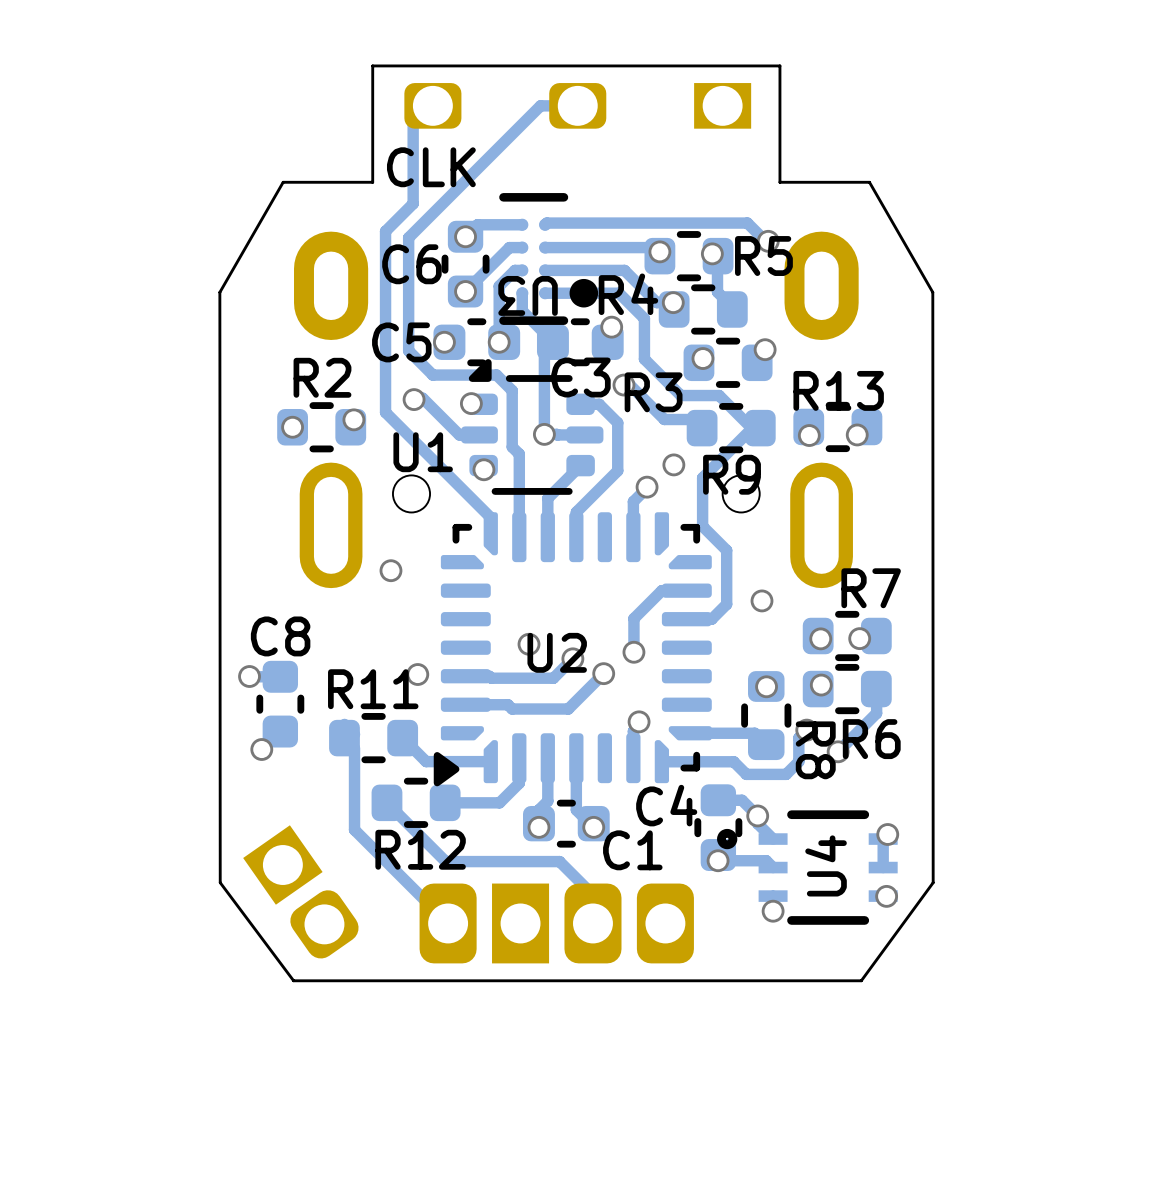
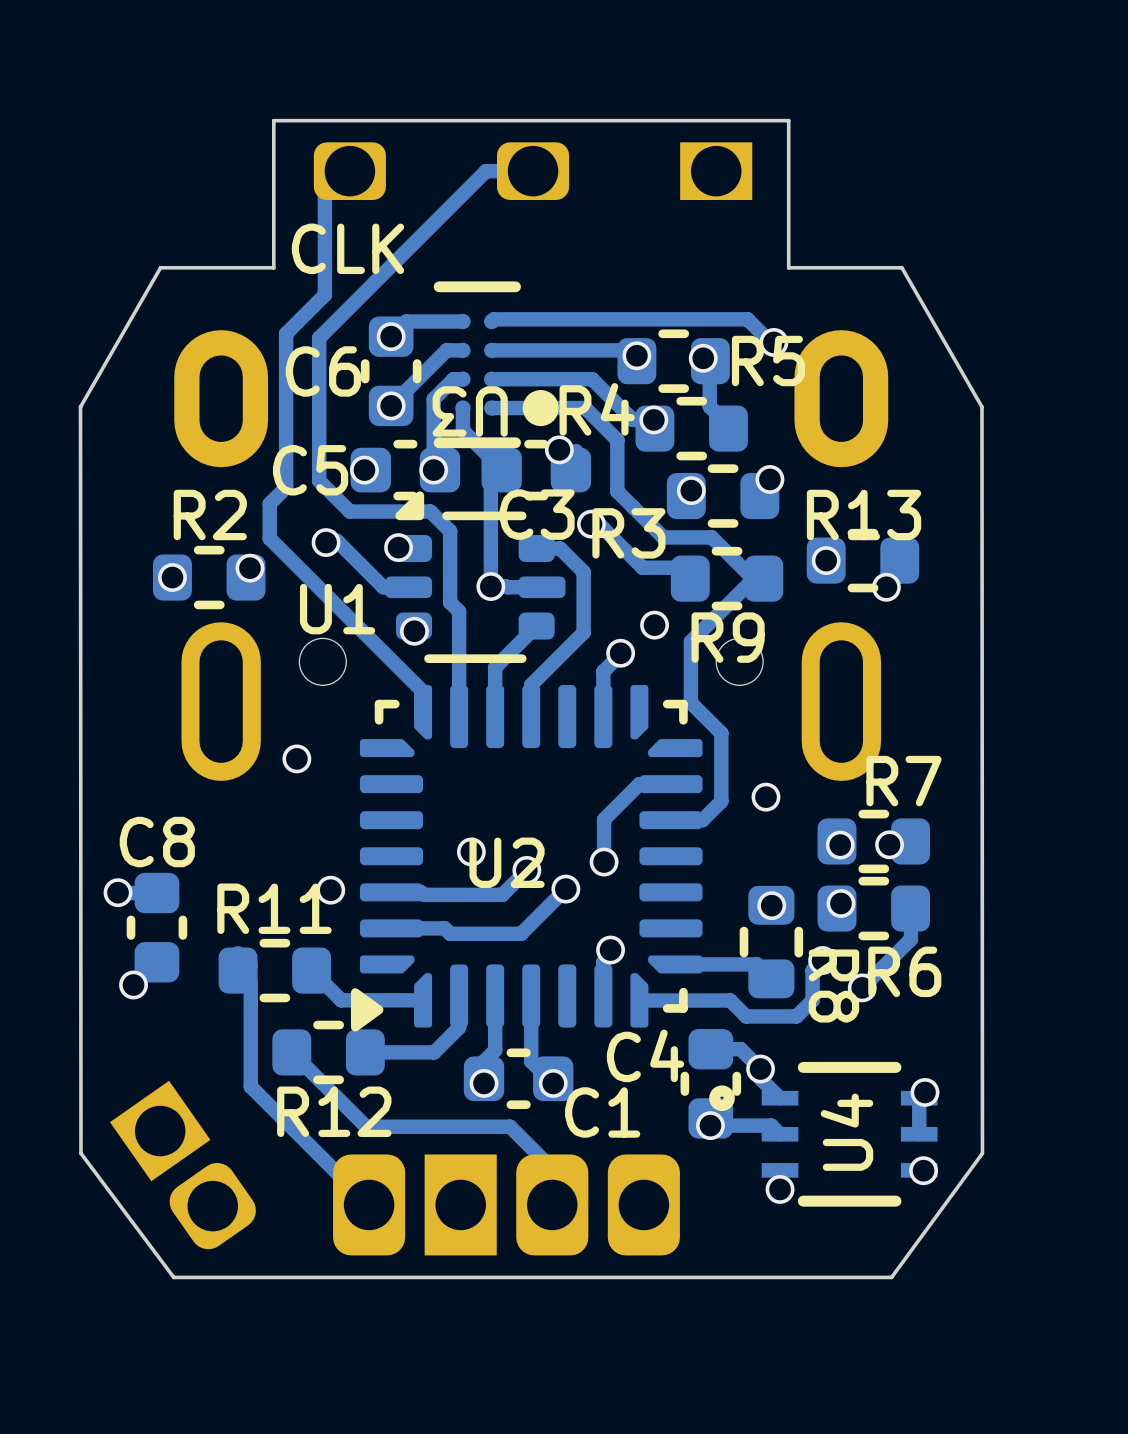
track: (385, 231) (385, 412) -> (290, 329) (286, 333) (286, 487) (269, 503) (269, 538) (290, 558)
via position: (611, 327) -> (559, 449)
R13 position: (837, 426) -> (862, 560)
via position: (809, 435) -> (826, 560)

